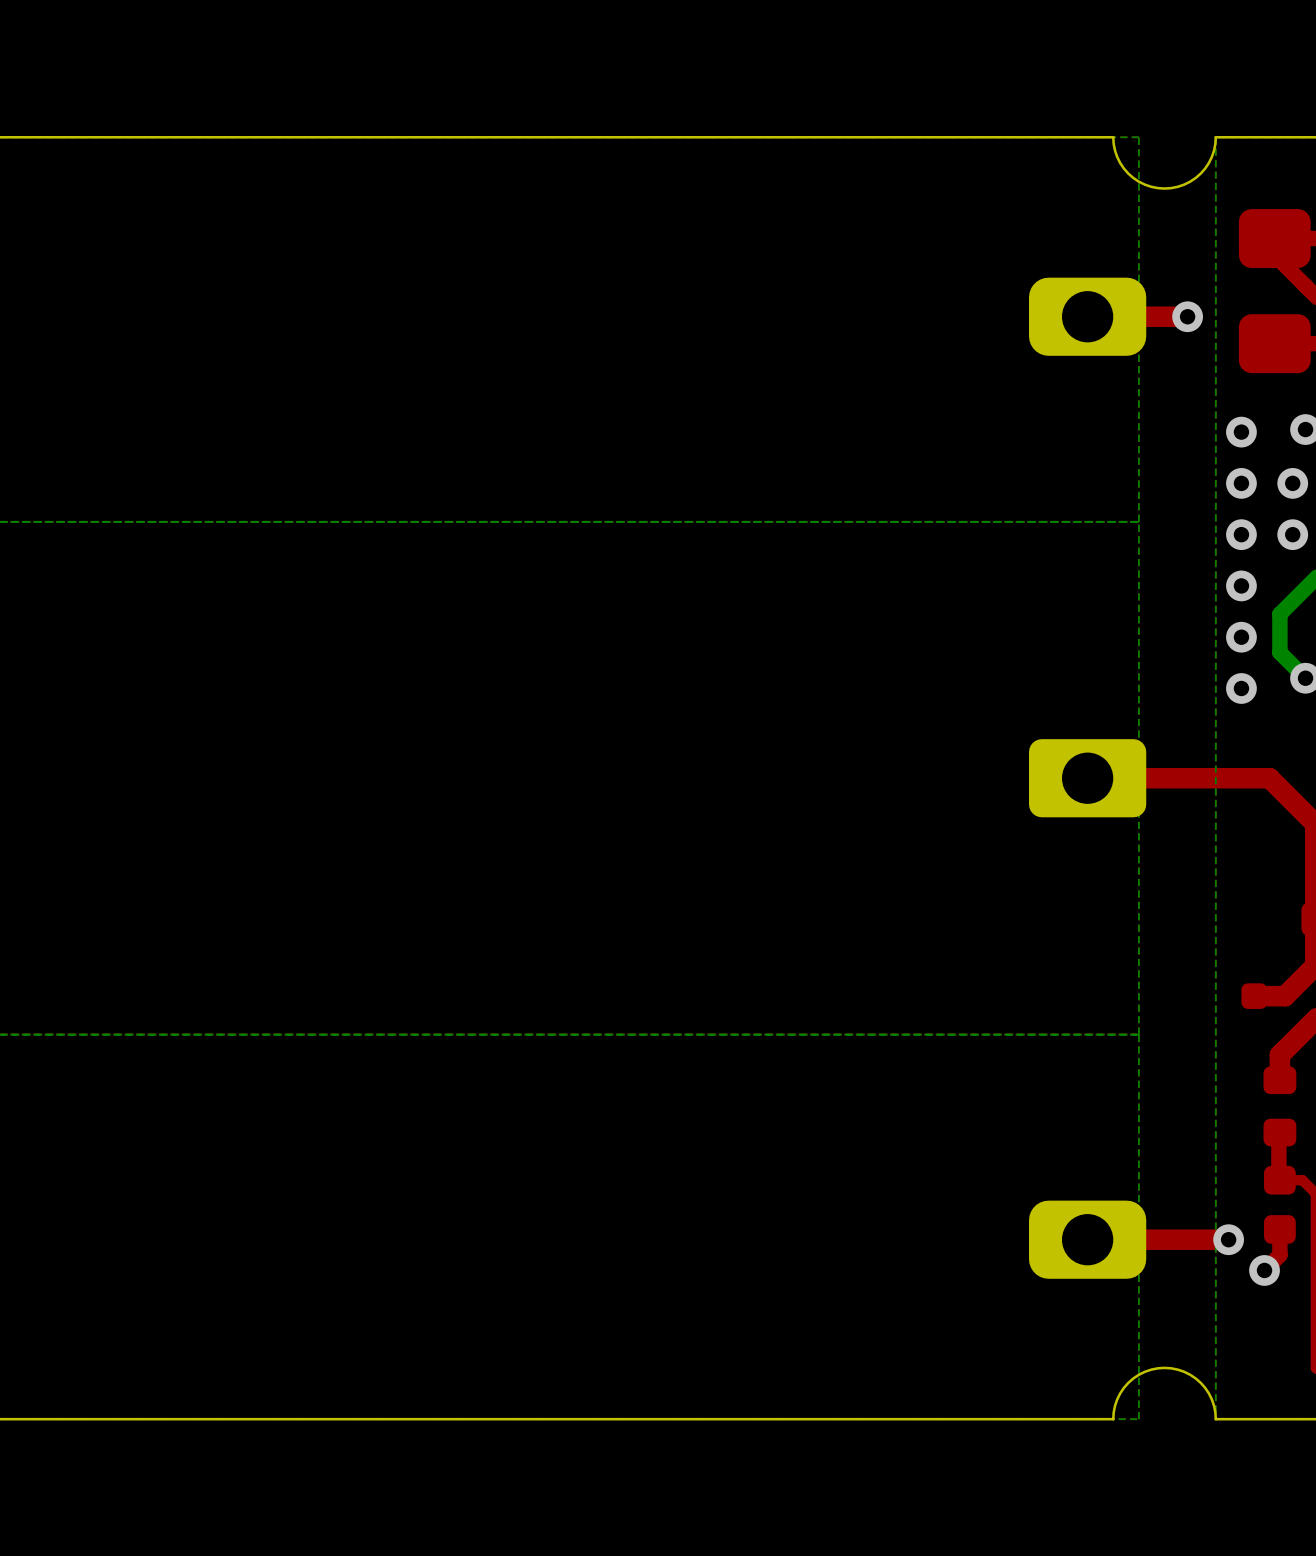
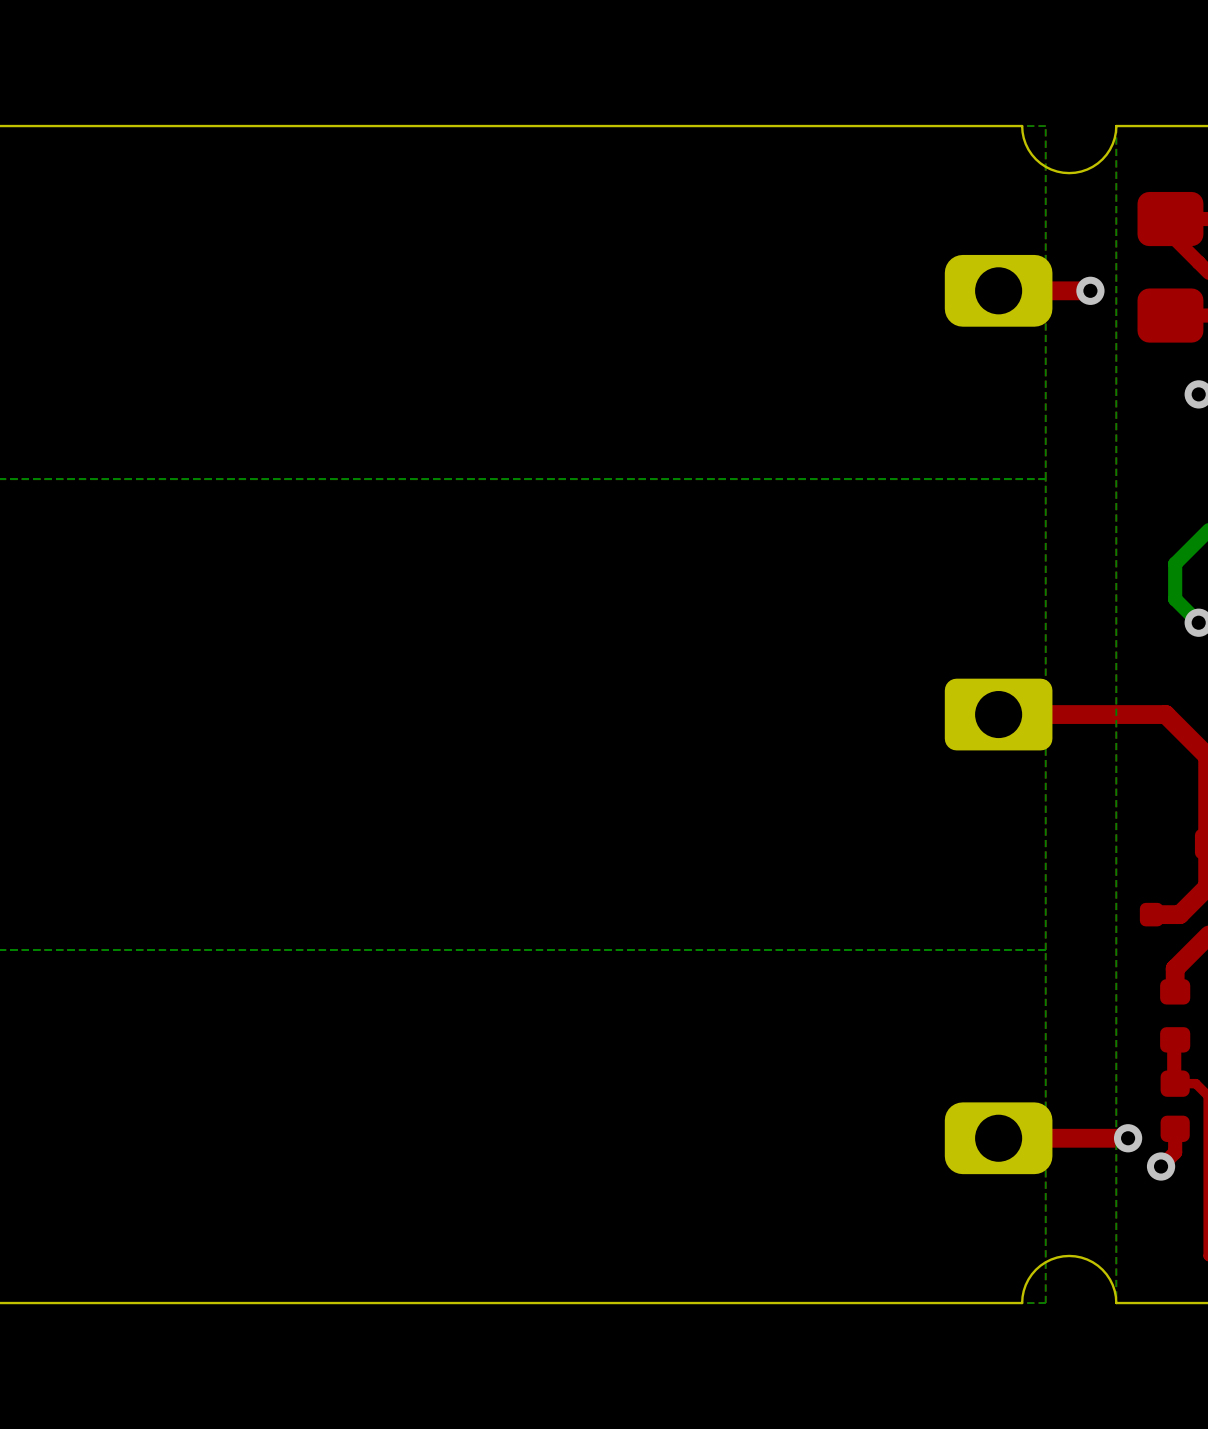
via: (1241, 432) -> none
via: (1241, 483) -> none
via: (1292, 483) -> none
via: (1241, 534) -> none
via: (1292, 534) -> none
via: (1241, 585) -> none
via: (1241, 637) -> none
via: (1241, 688) -> none

